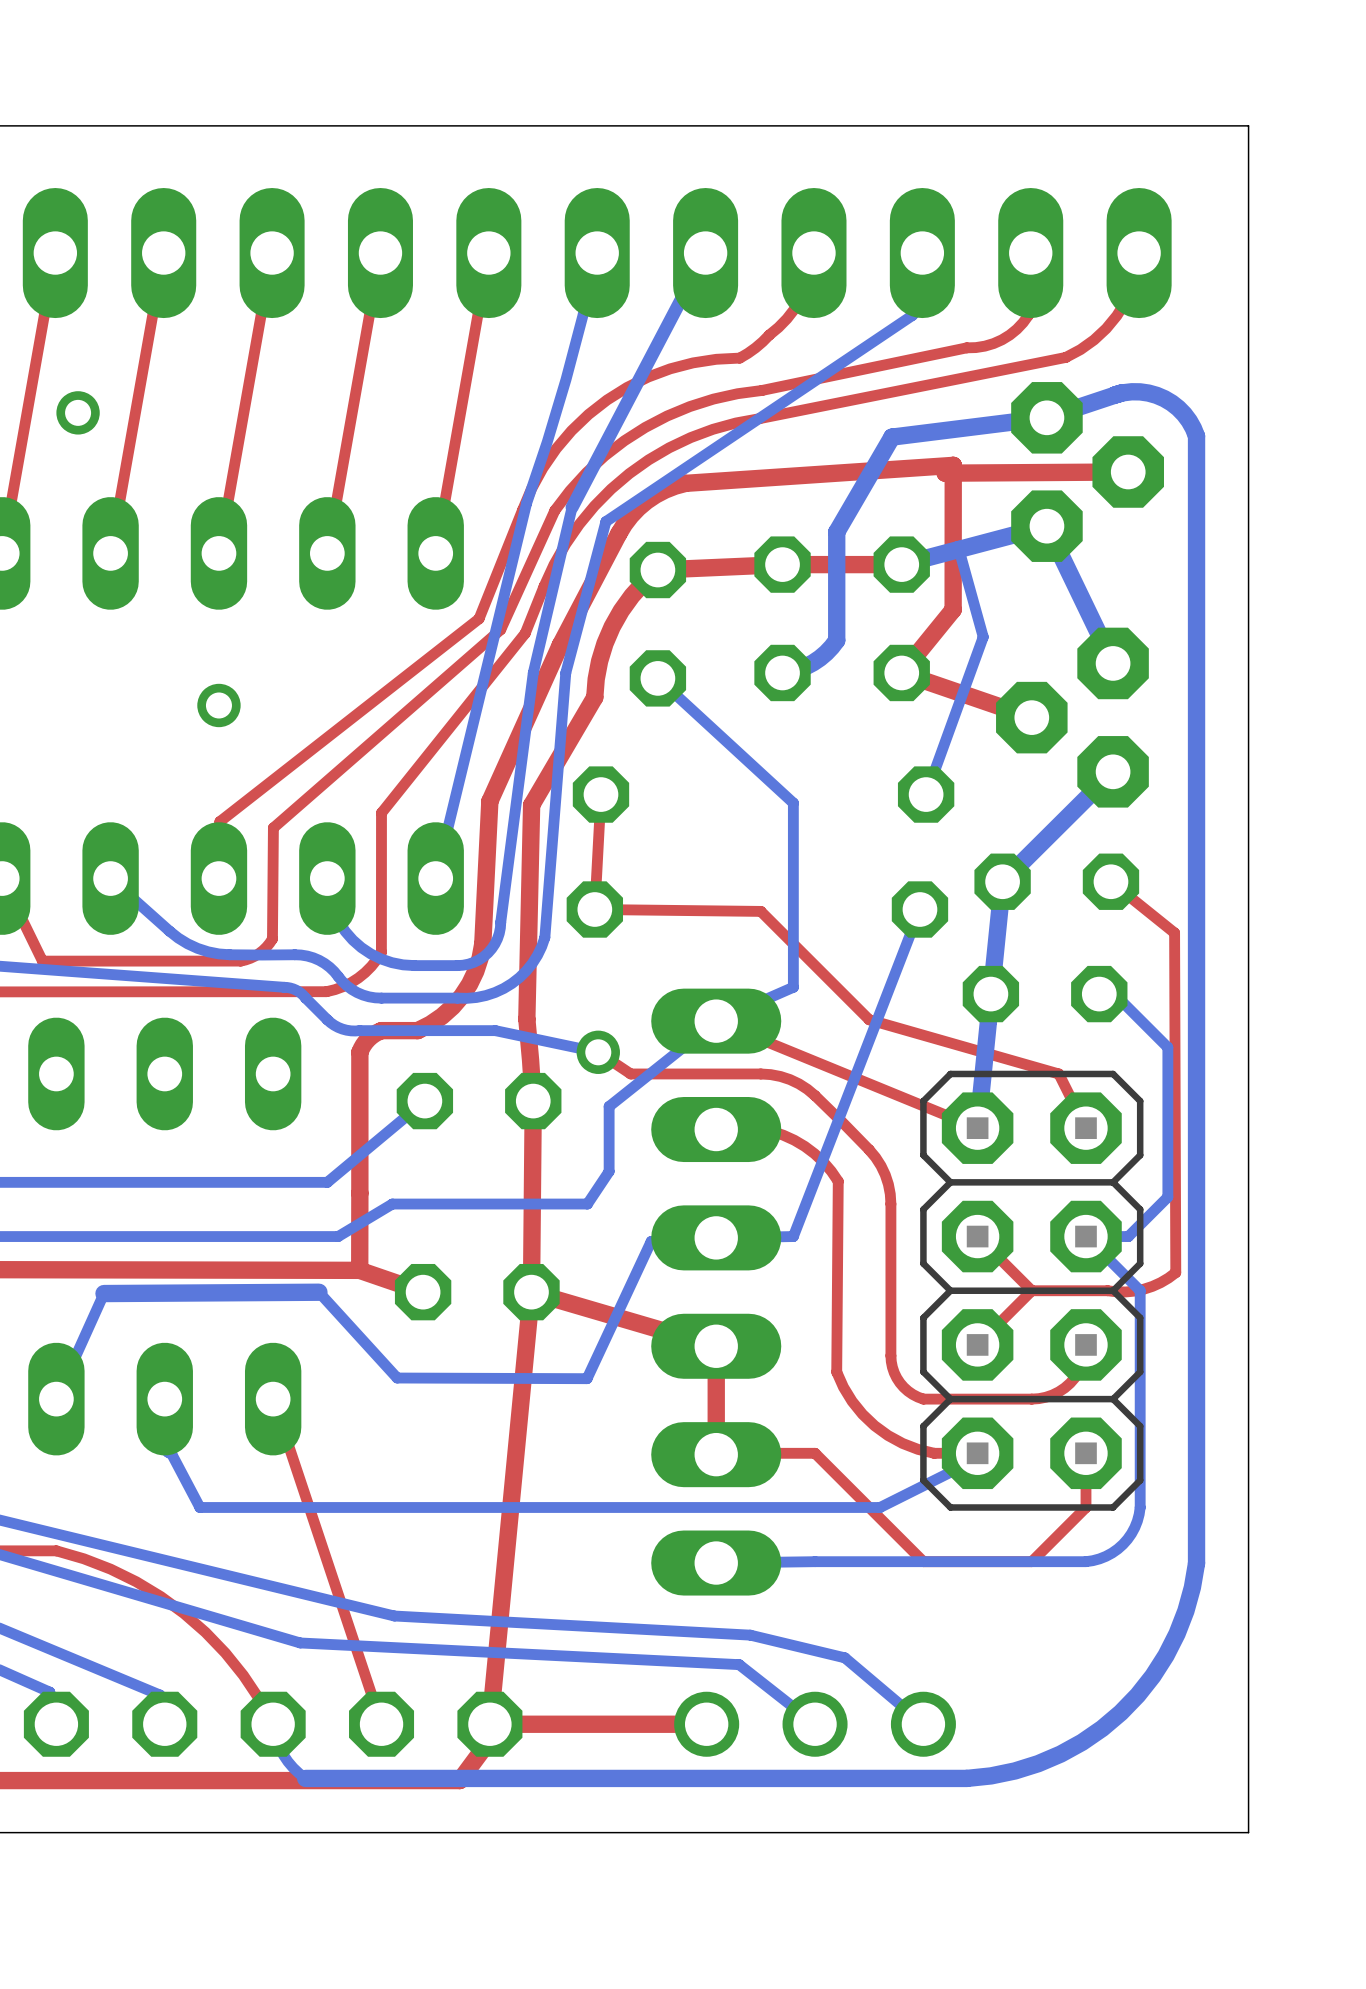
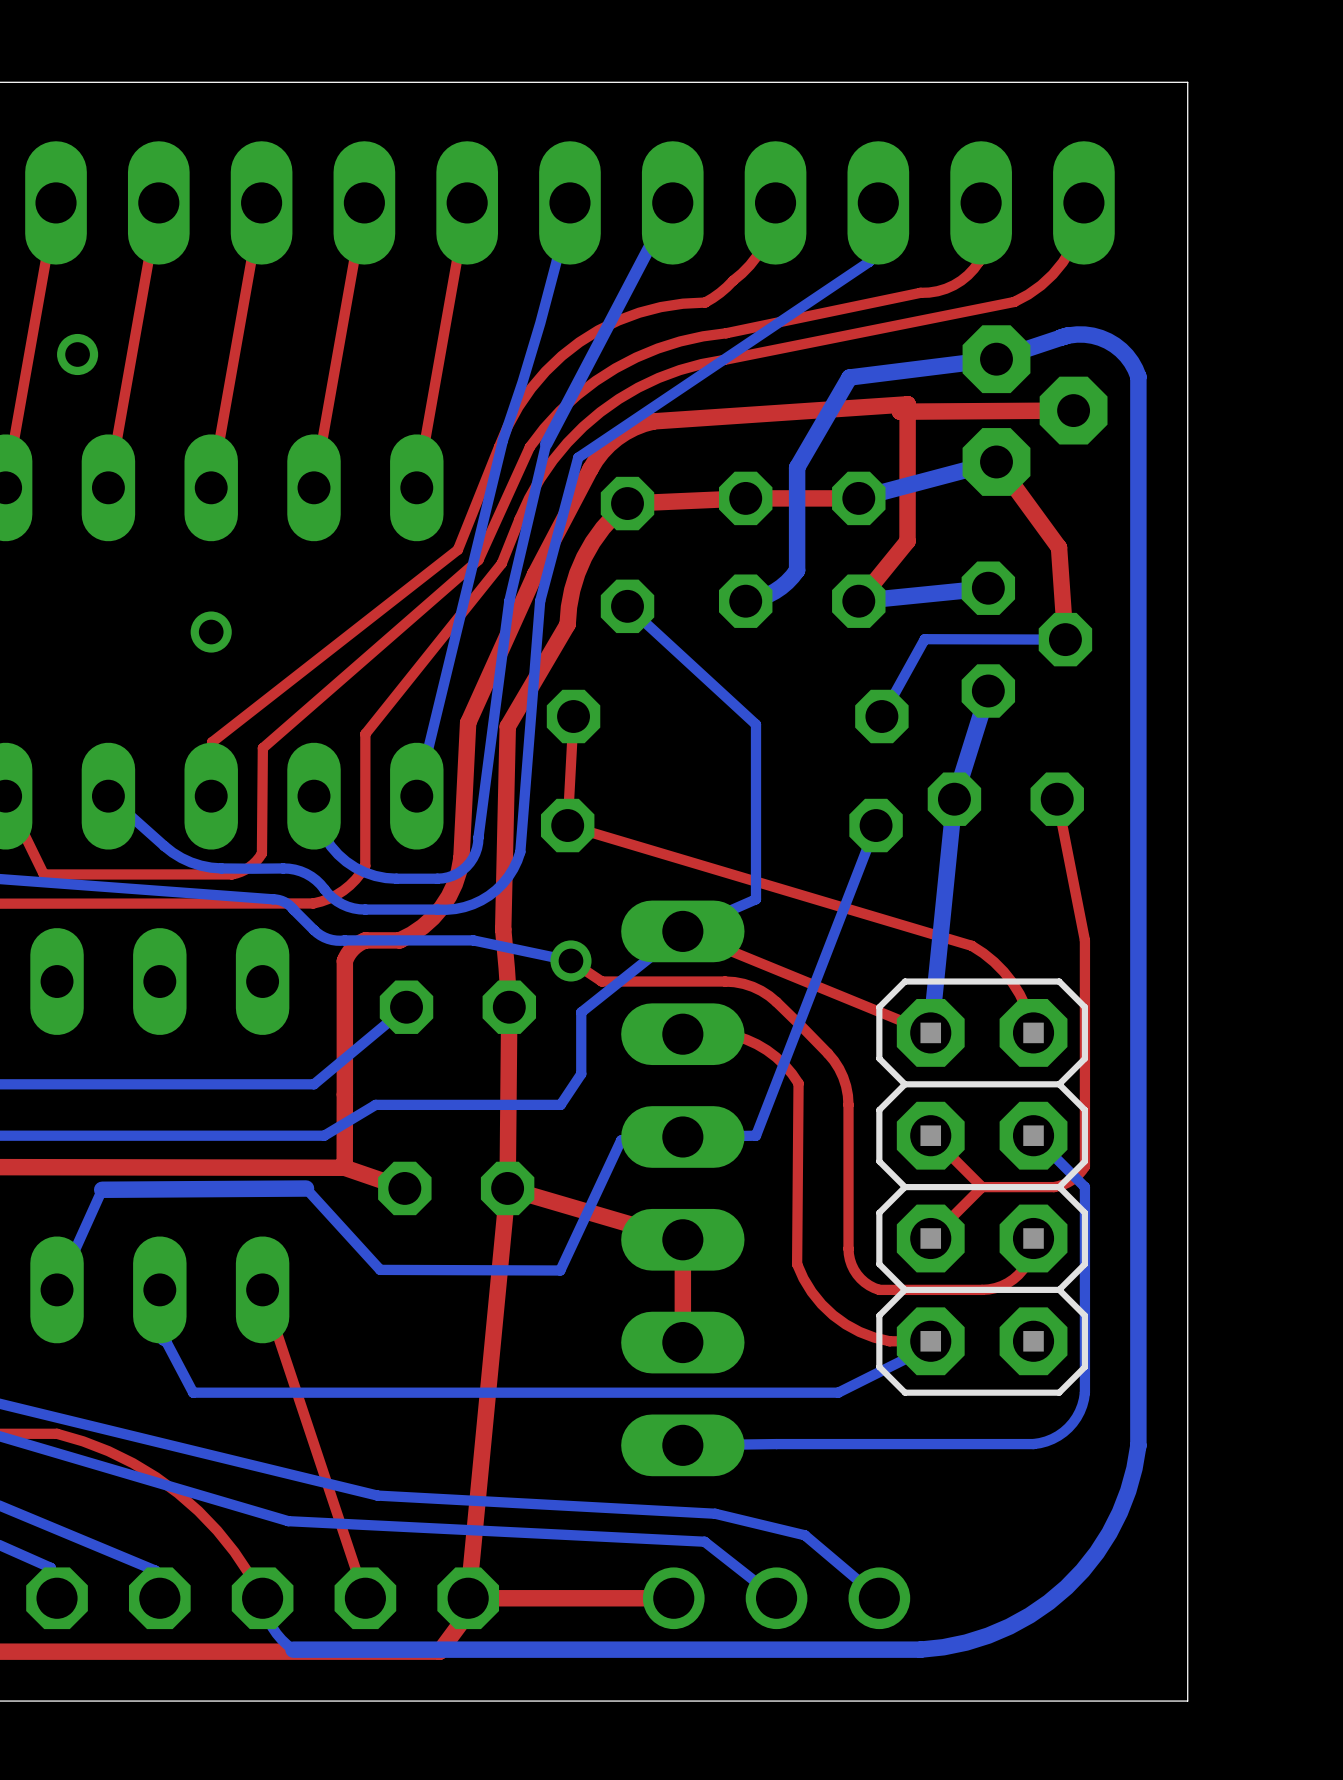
top track: none -> (996, 461) (1059, 547) (1065, 639)
bottom track: (1046, 526) (1113, 663) -> none
bottom track: (958, 549) (983, 637) (926, 794) -> (1065, 639) (924, 639) (881, 716)
part footprint: [996, 627, 1149, 808] -> [961, 561, 1093, 718]
bottom track: none -> (988, 588) (858, 601)
top track: (901, 672) (1031, 717) -> none
bottom track: (1113, 771) (1002, 881) -> (988, 691) (954, 799)
top track: (1110, 881) (1174, 932) (1175, 1272) (1160, 1282) (1143, 1289) (1125, 1291) (1107, 1290) -> (1057, 799) (1084, 940) (1084, 1166) (1071, 1180) (1054, 1187)
top track: (594, 909) (760, 911) (869, 1019) (1058, 1073) (1085, 1128) -> (567, 825) (971, 945) (994, 961) (1012, 982) (1025, 1006) (1033, 1032)
part: (1045, 994) -> none
bottom track: (1099, 994) (1114, 994) (1167, 1047) (1167, 1197) (1128, 1236) (1085, 1236) -> none
top track: (1085, 1453) (1085, 1507) (1031, 1561) (923, 1561) (815, 1453) (716, 1454) -> none

